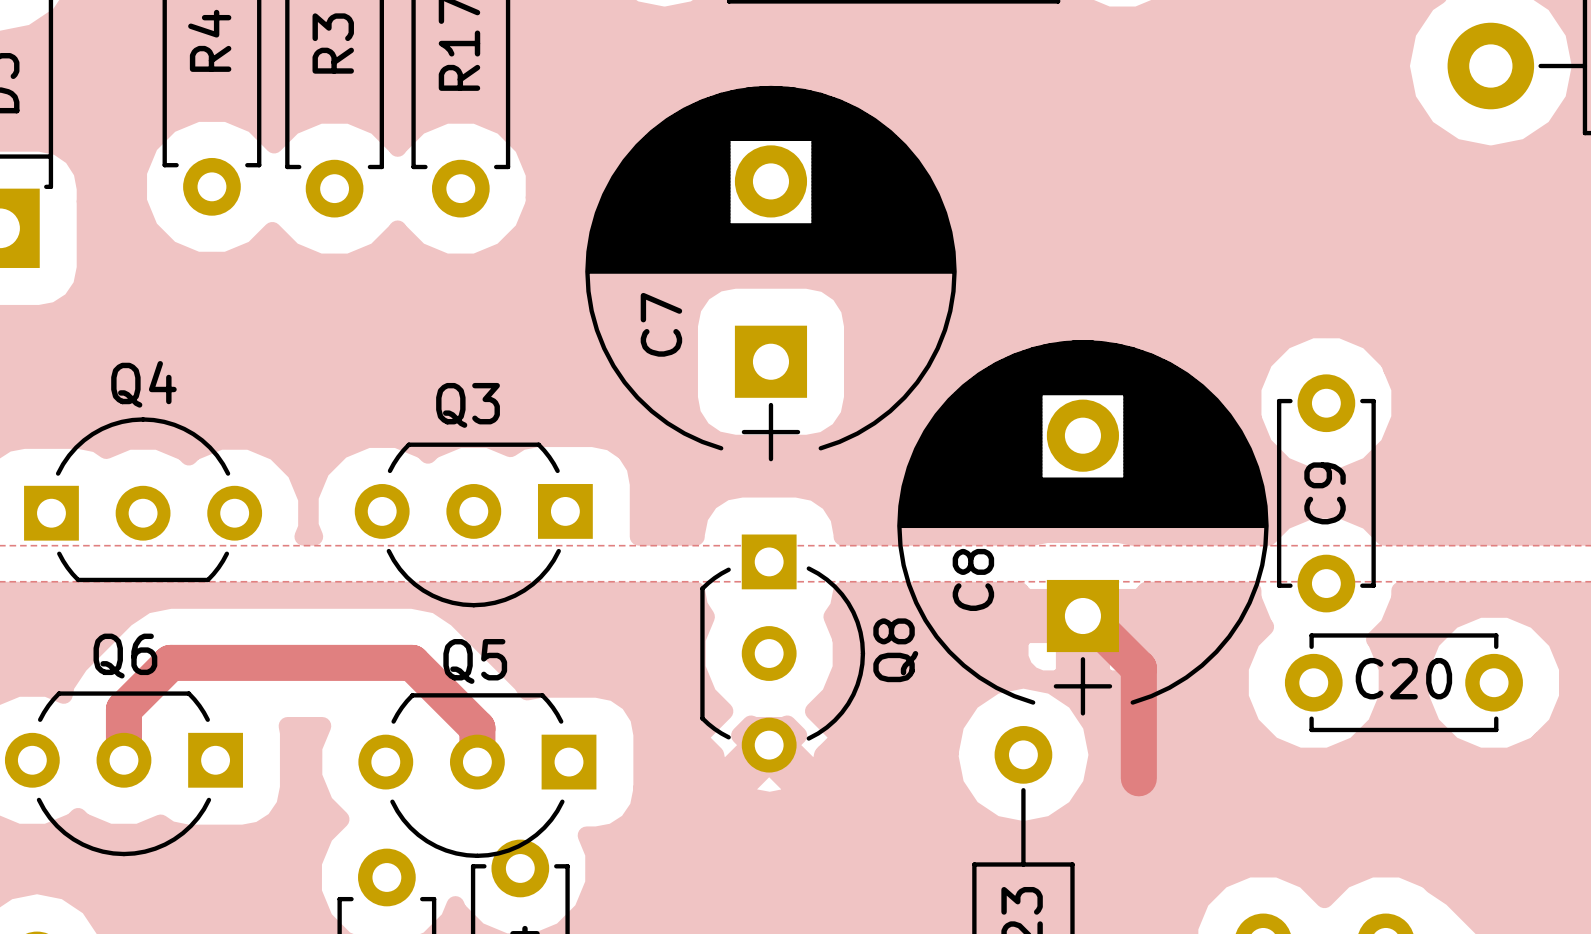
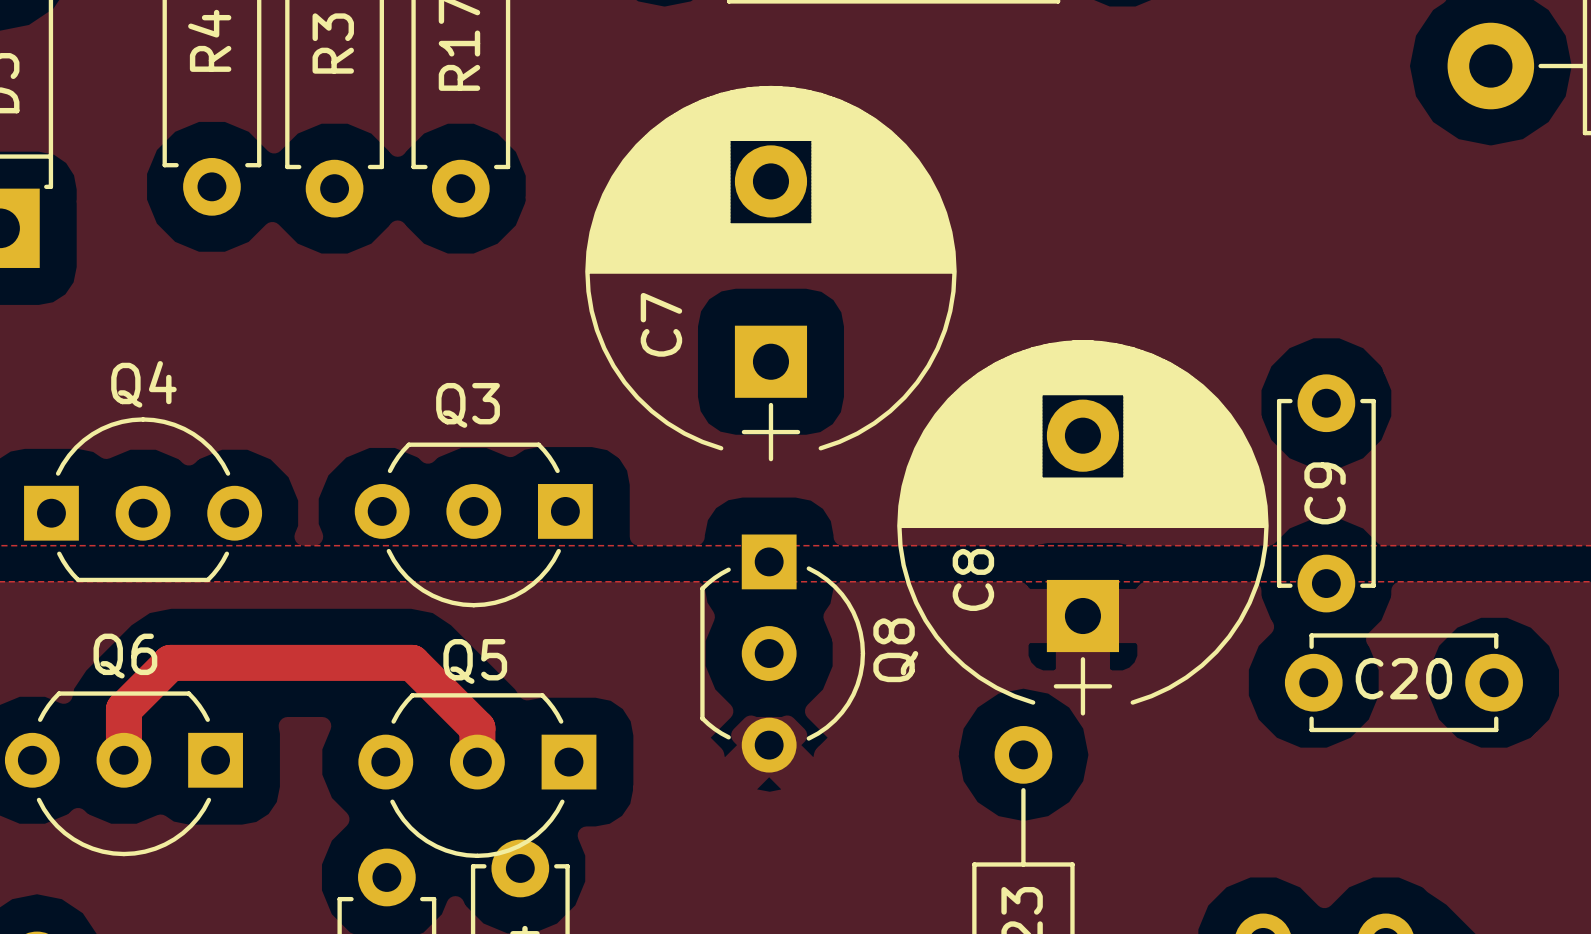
track: (1086, 616) (1138, 668) (1138, 778) -> none

